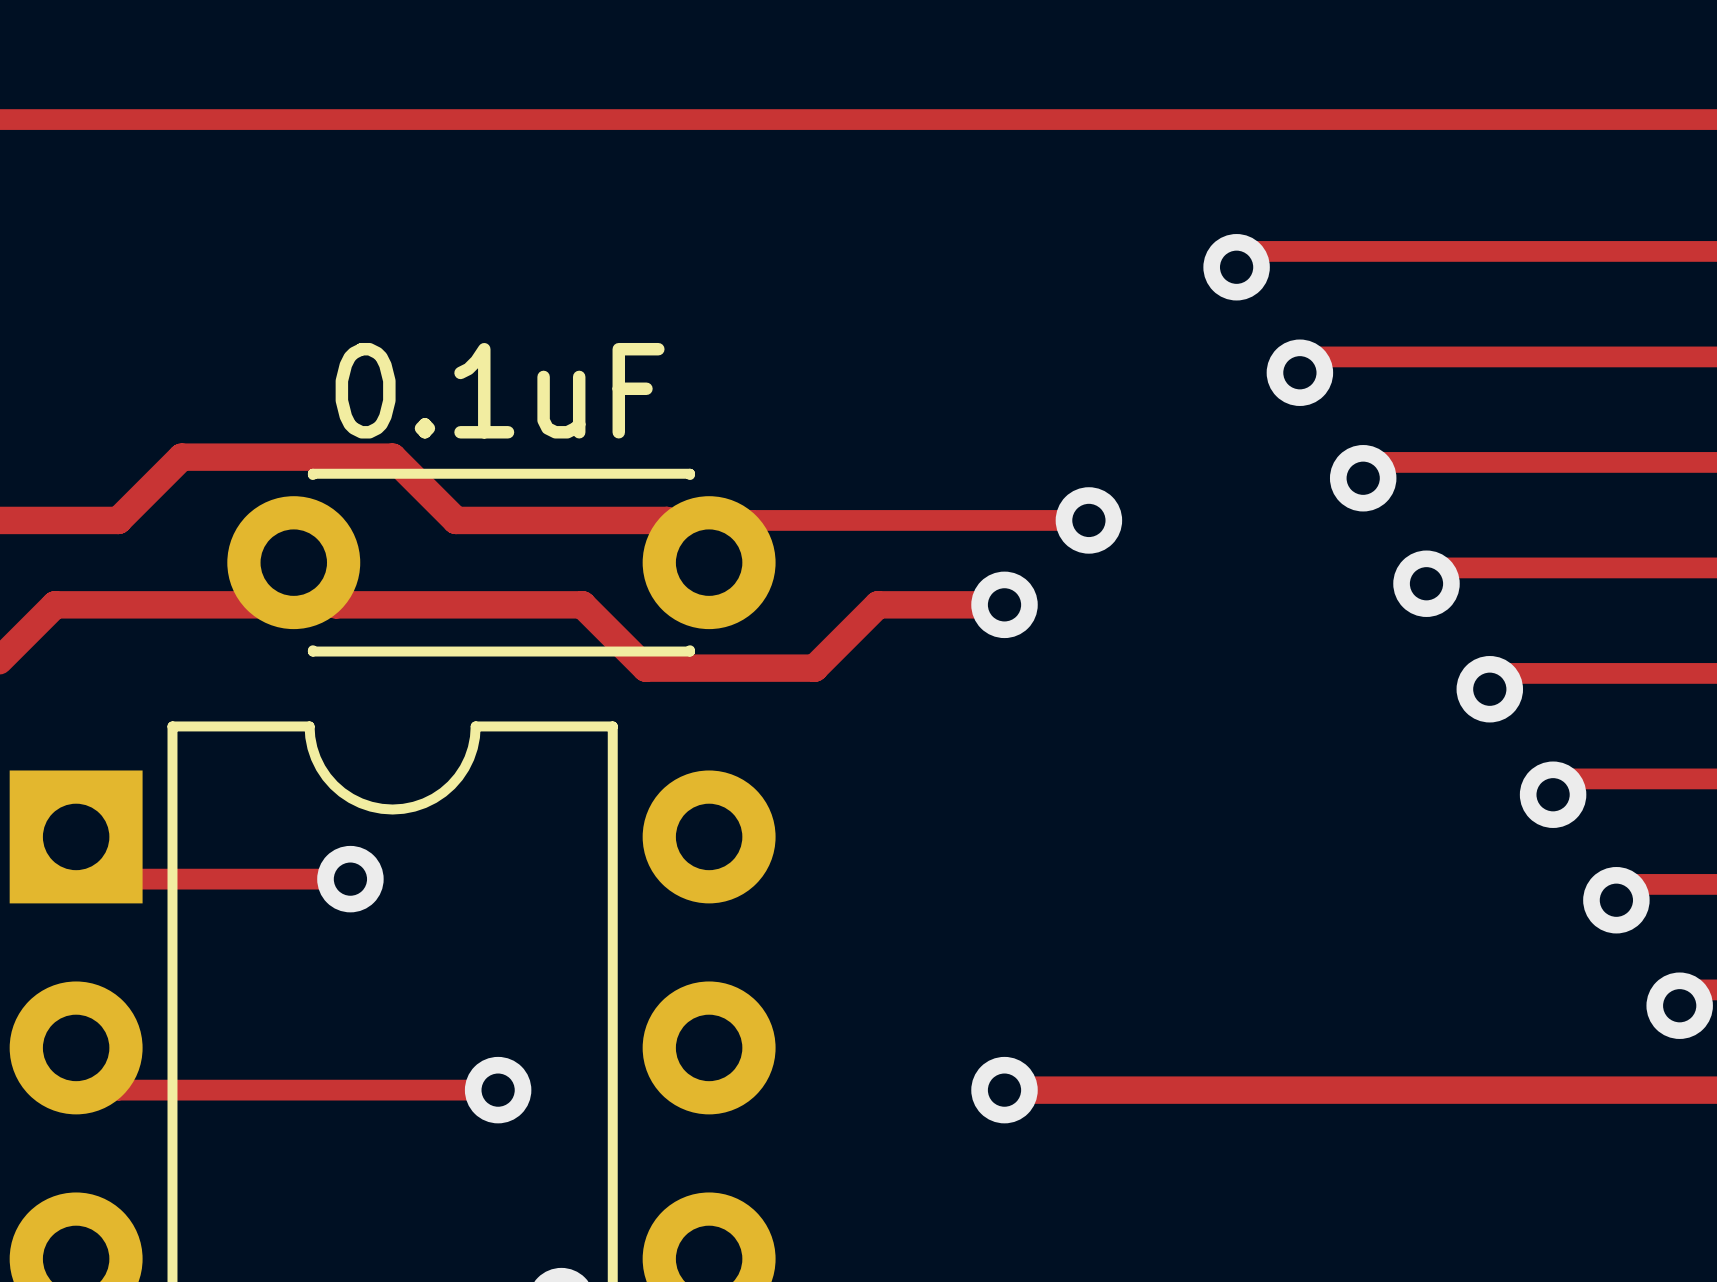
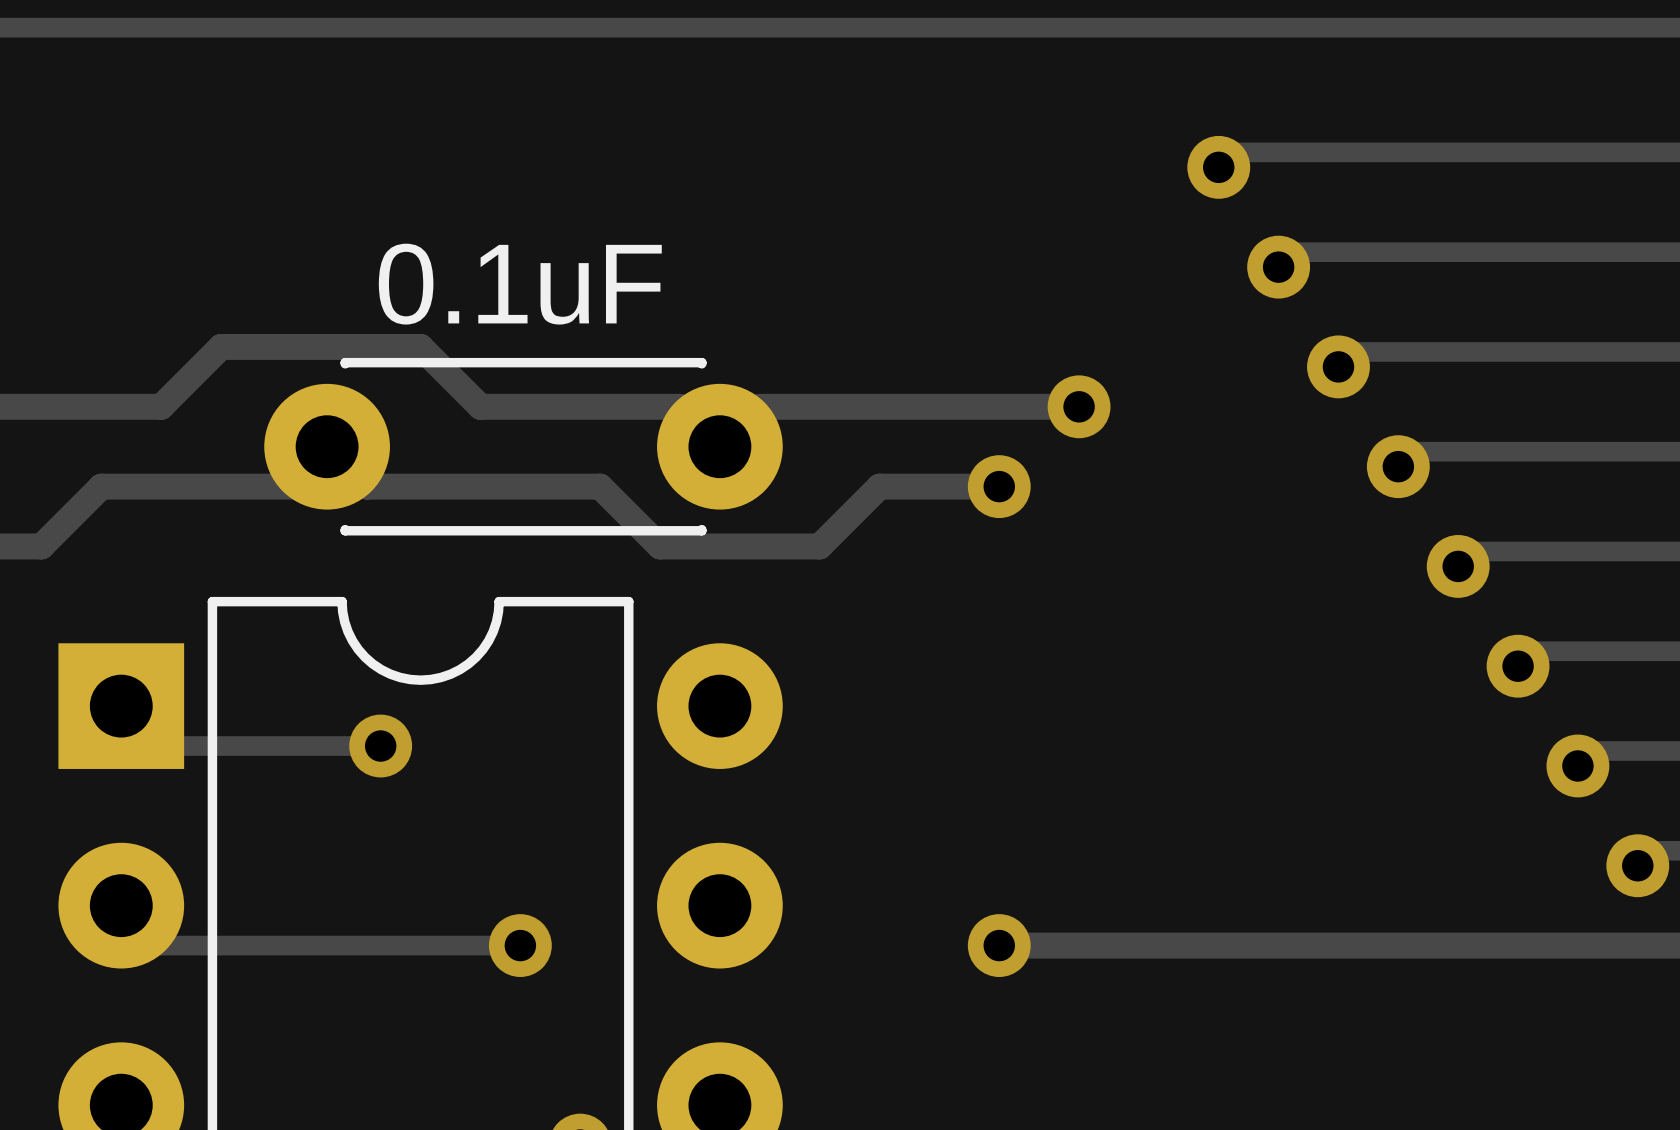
track width: thin (1088, 520) (751, 520) (709, 562) -> thick (1079, 406) (759, 406) (719, 446)

